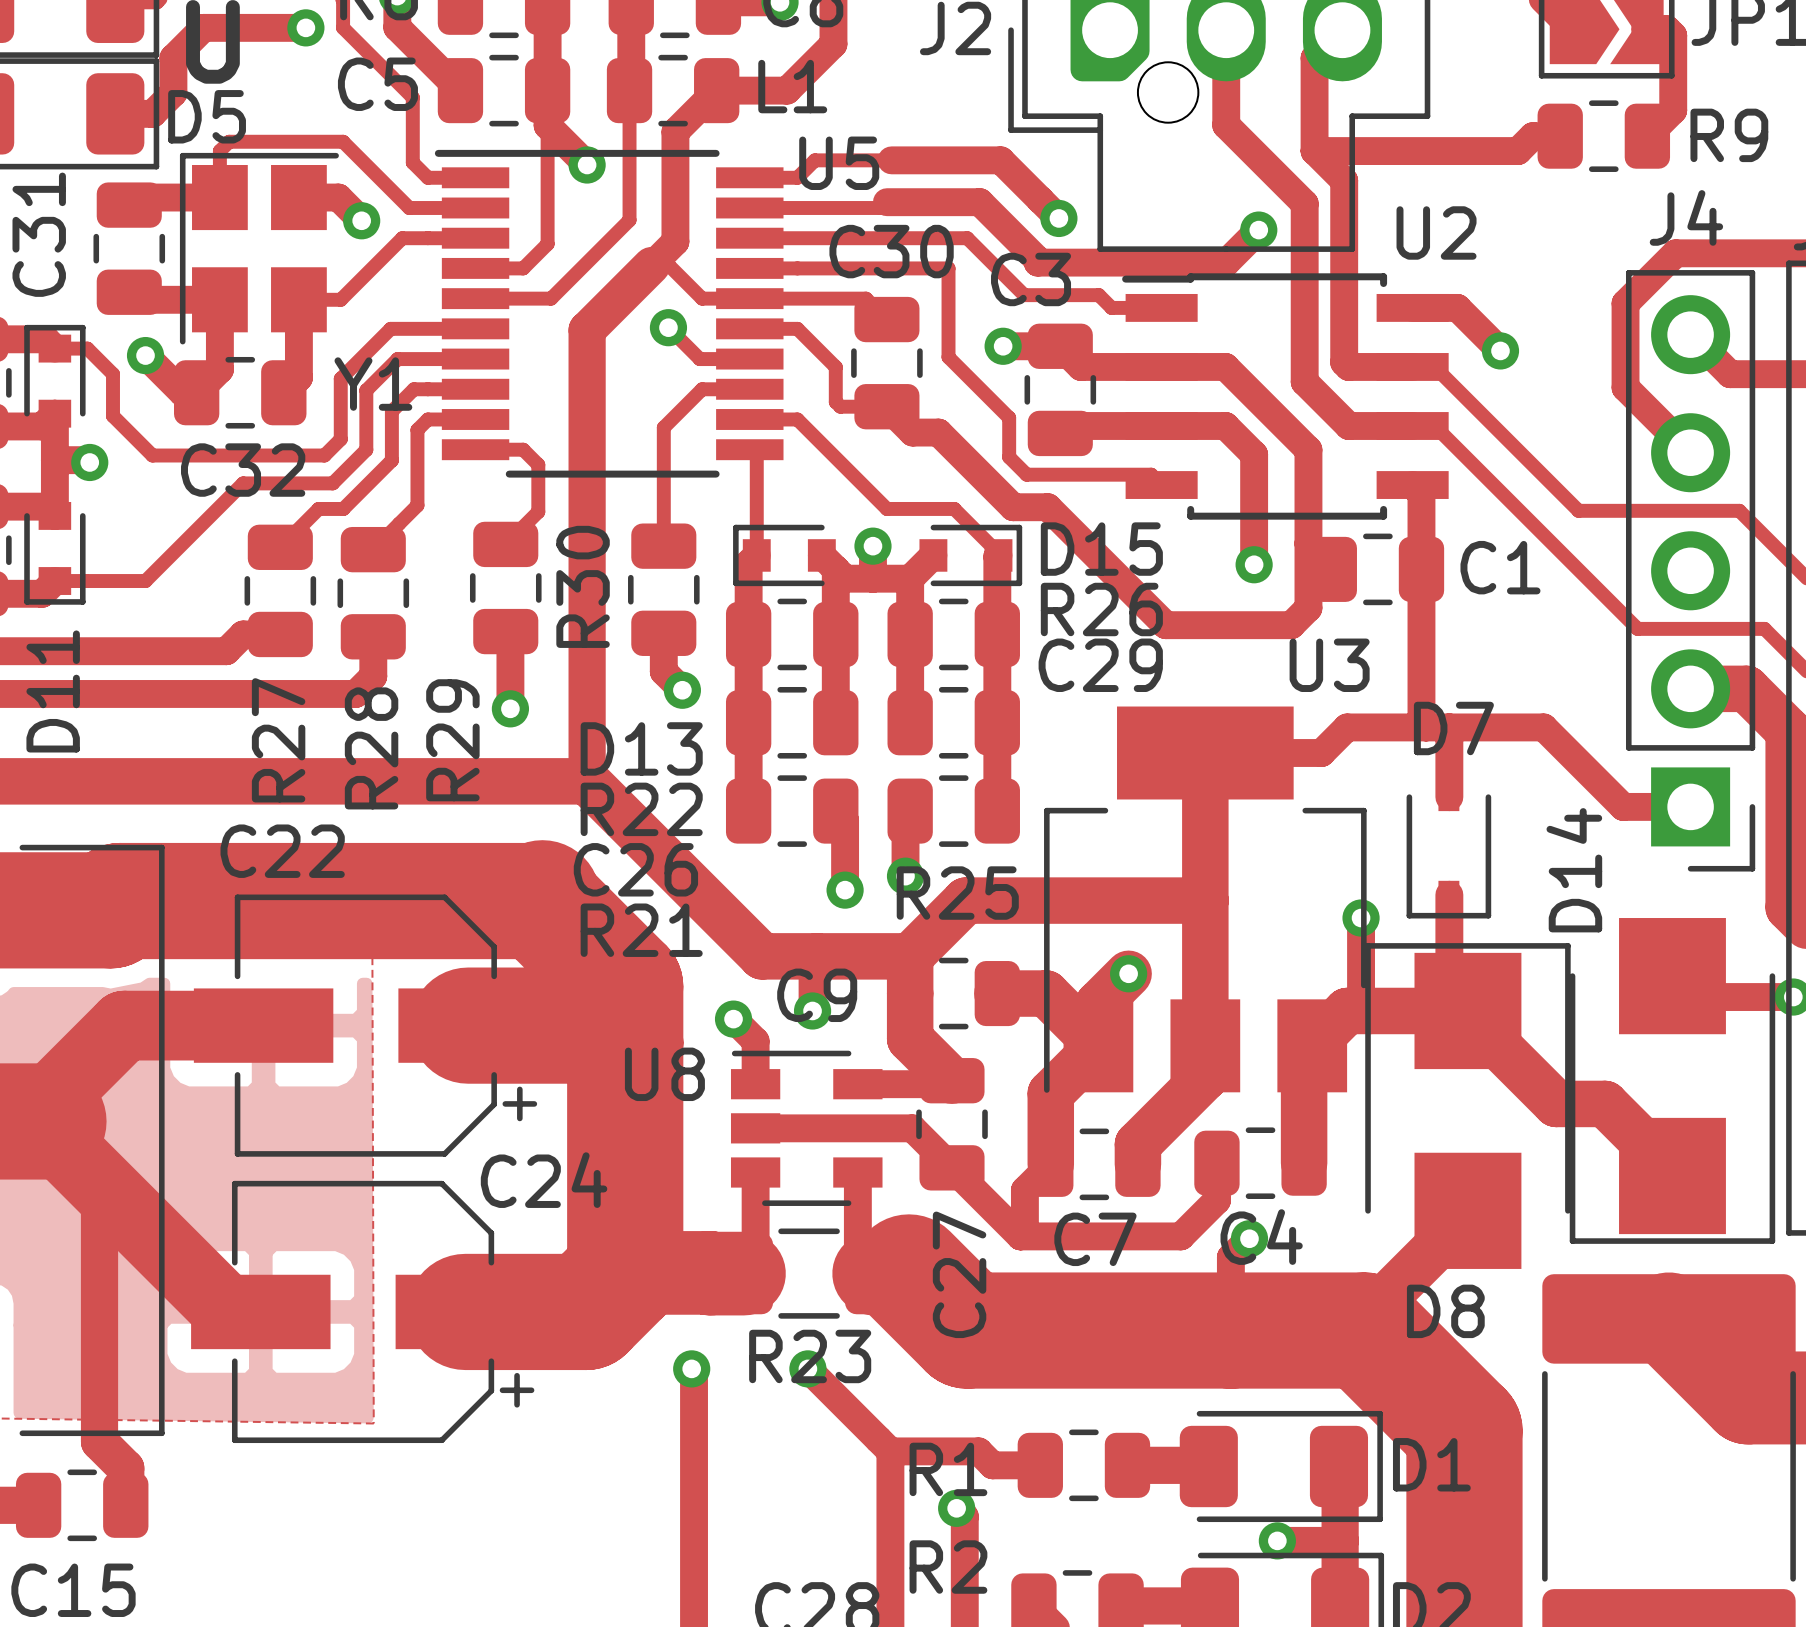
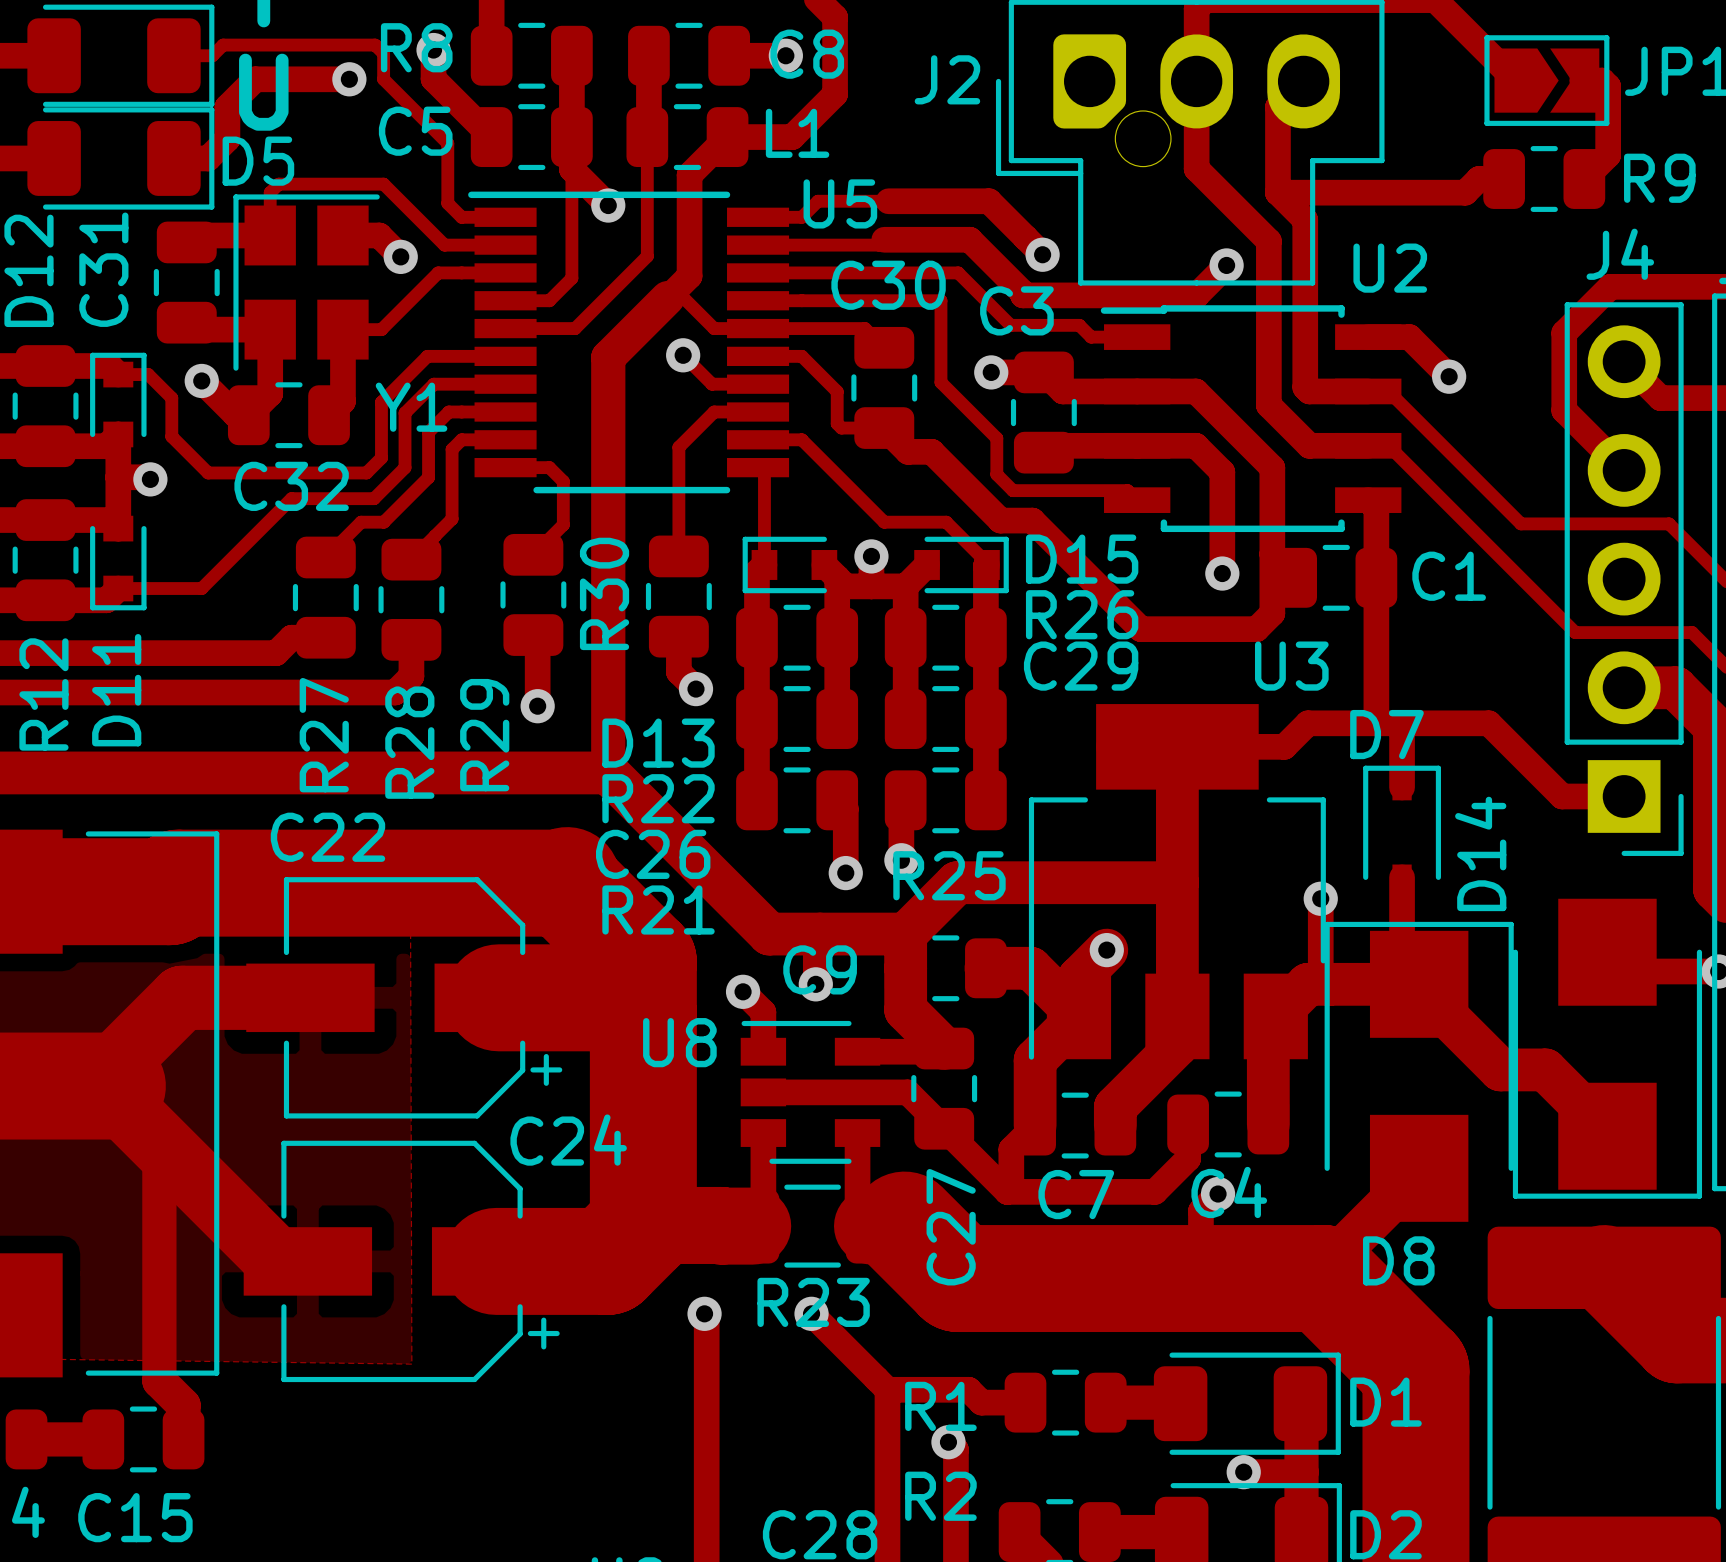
D7 rotation: 0° (1448, 850) -> 180° (1402, 827)
D14 name position: D14 (1574, 870) -> D14 (1480, 853)

